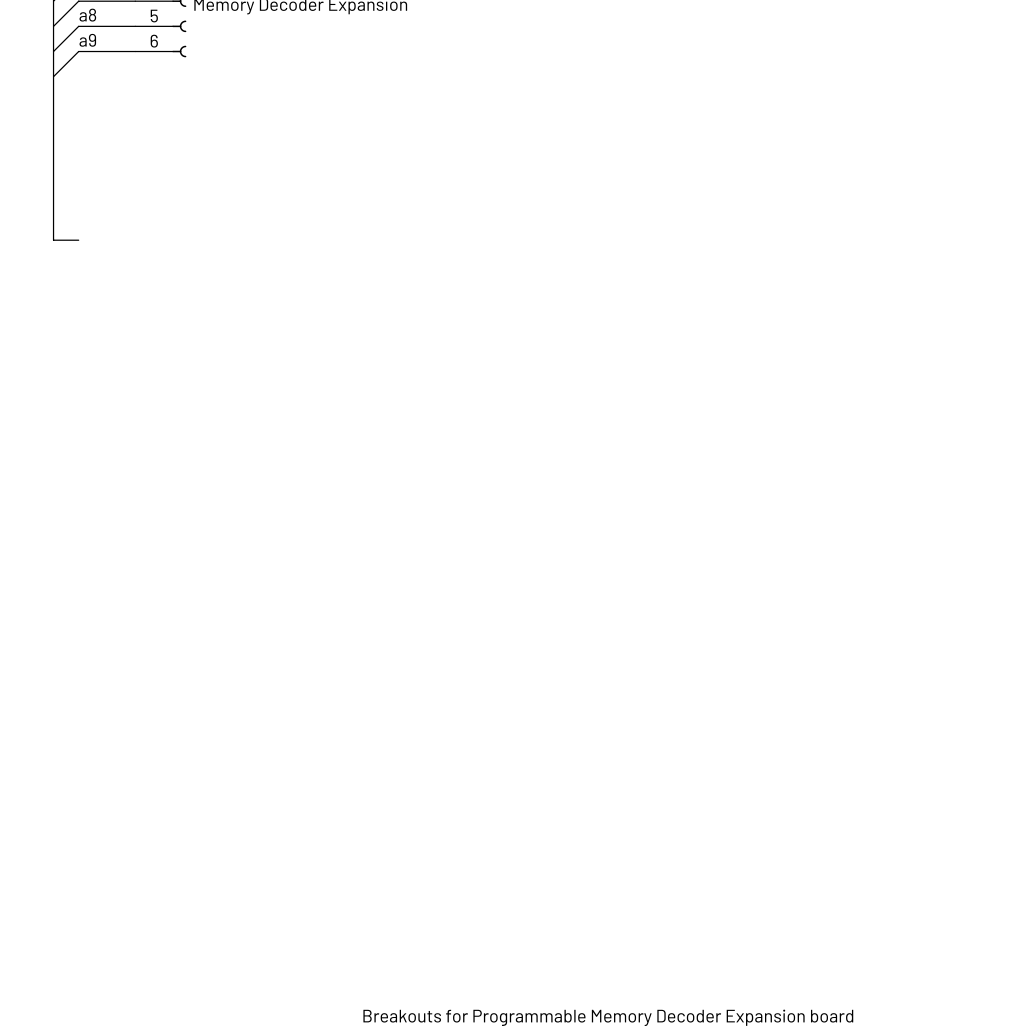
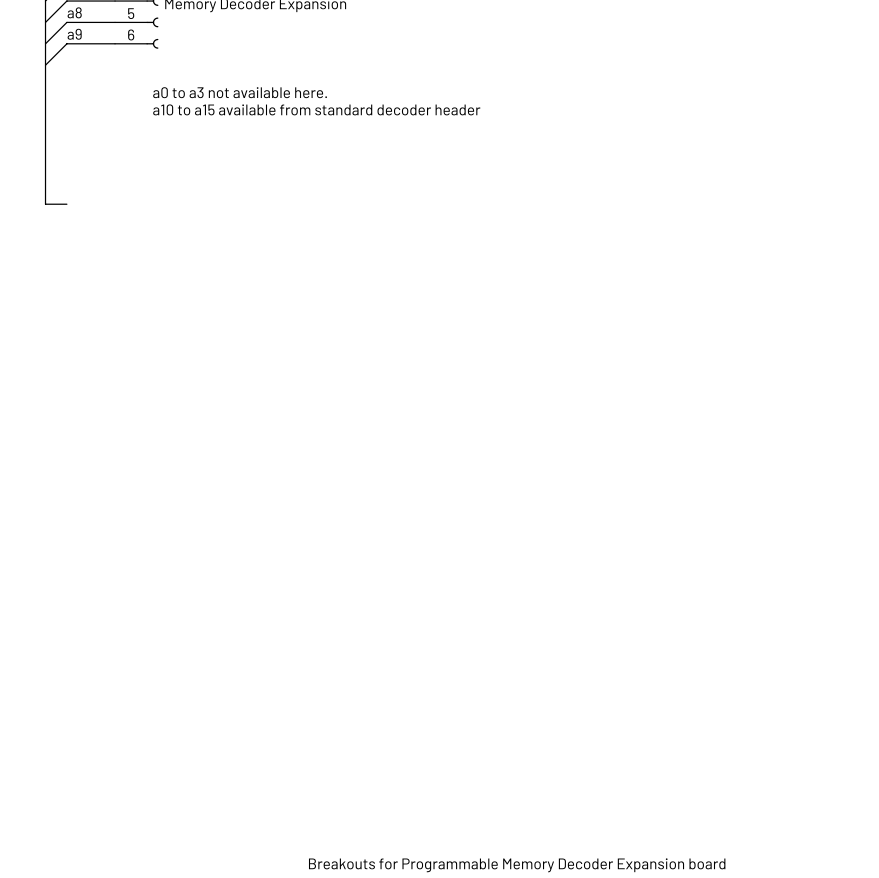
text: none -> a0 to a3 not available here. (240, 92)
text: none -> a10 to a15 available from standard decoder header (316, 109)

